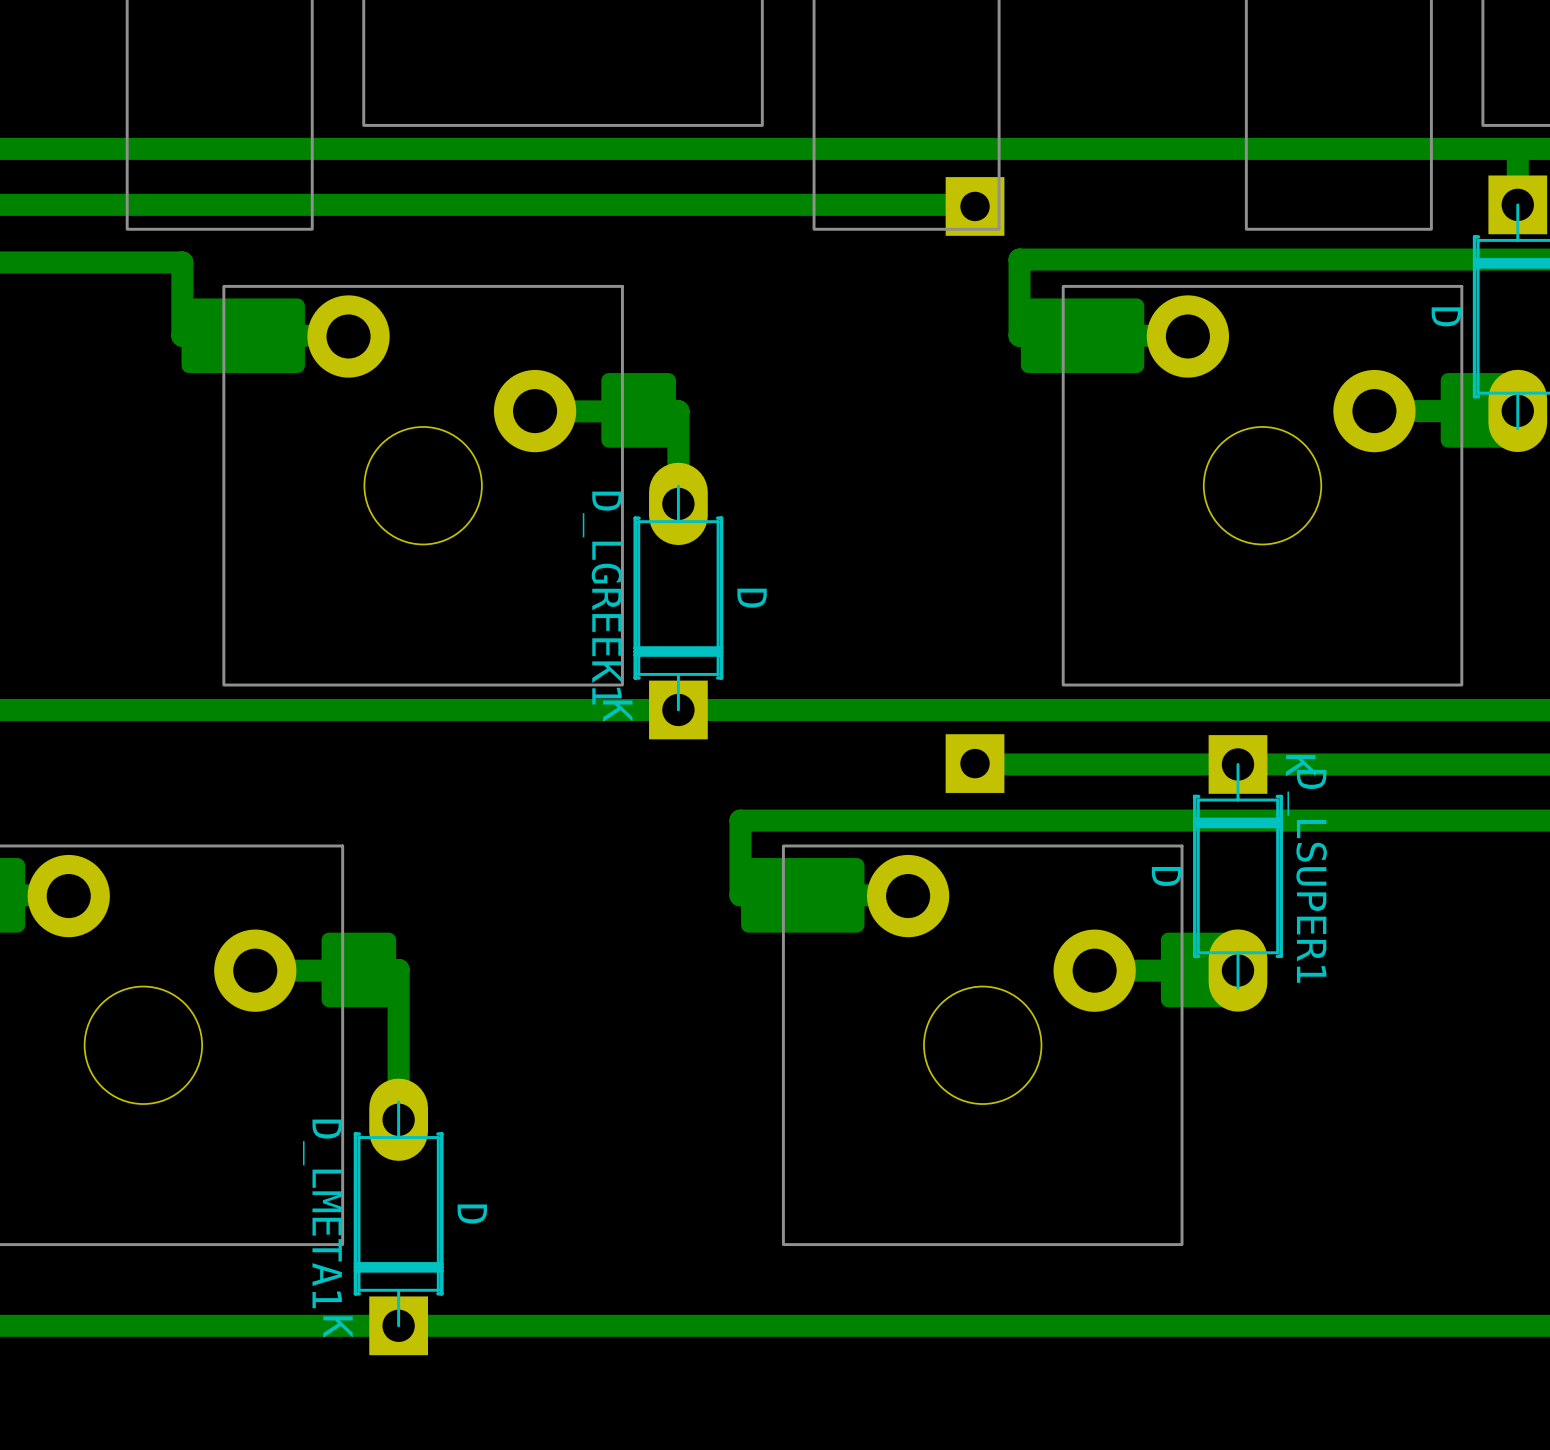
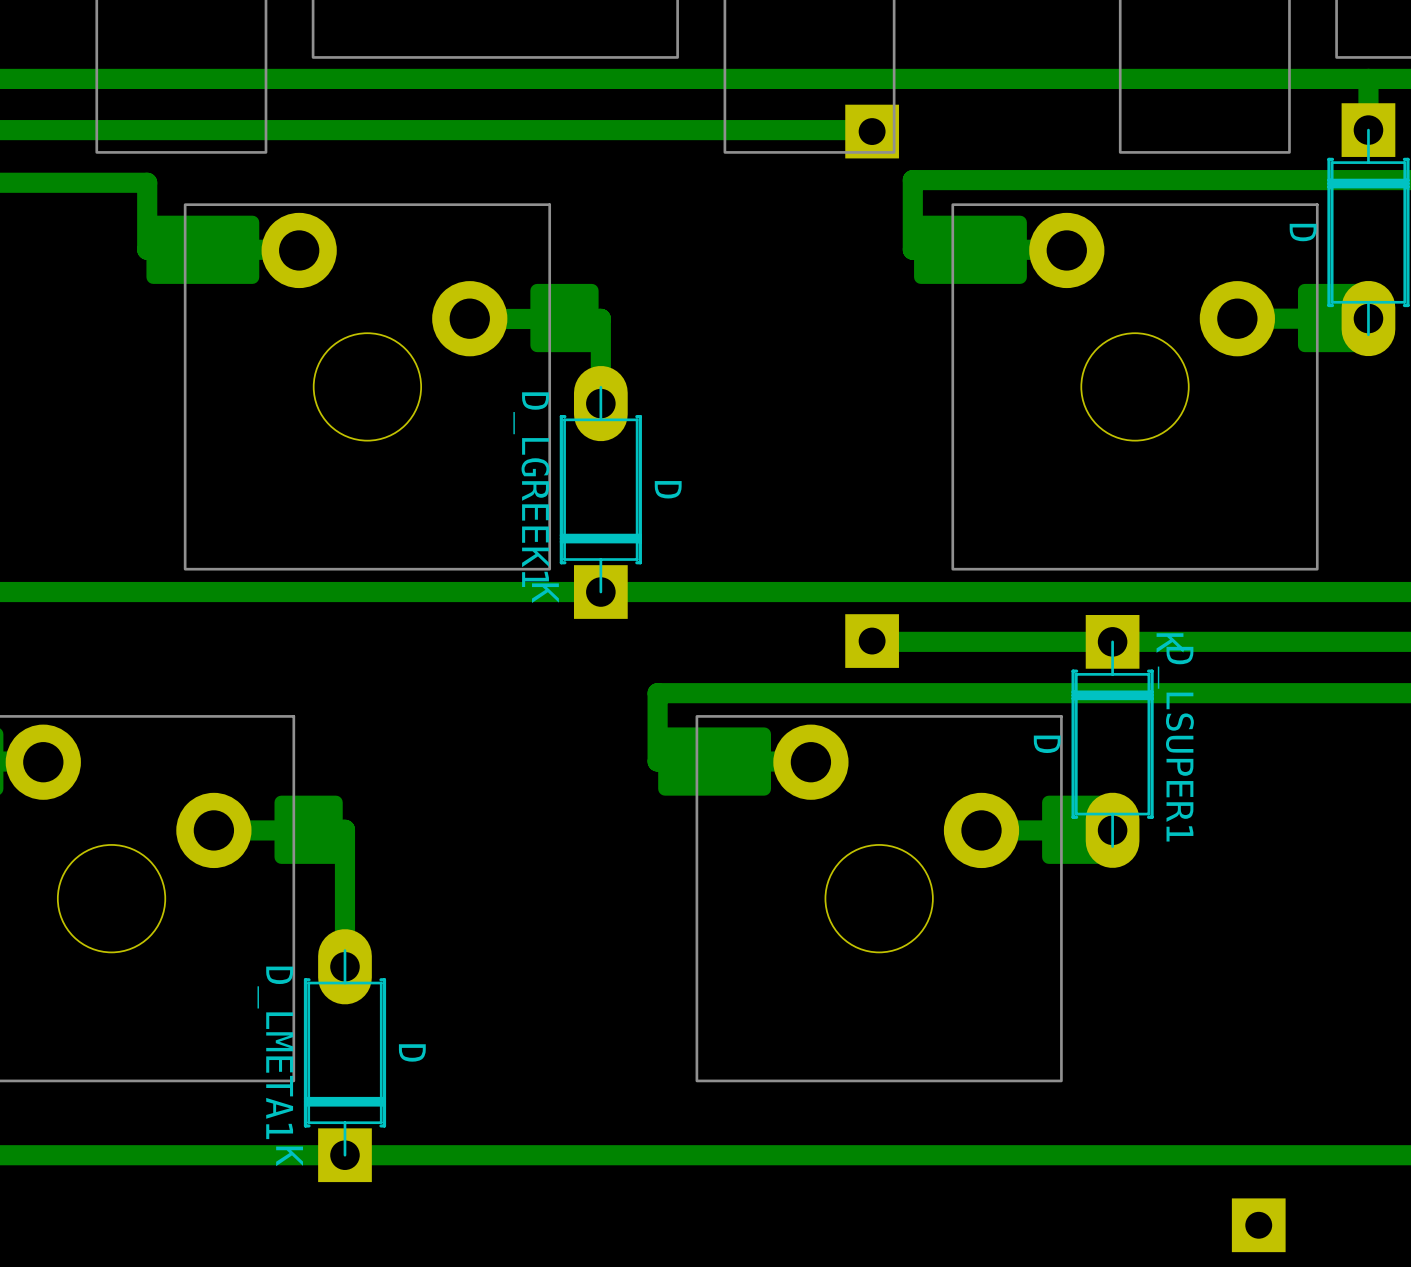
part: none -> (1258, 1225)

